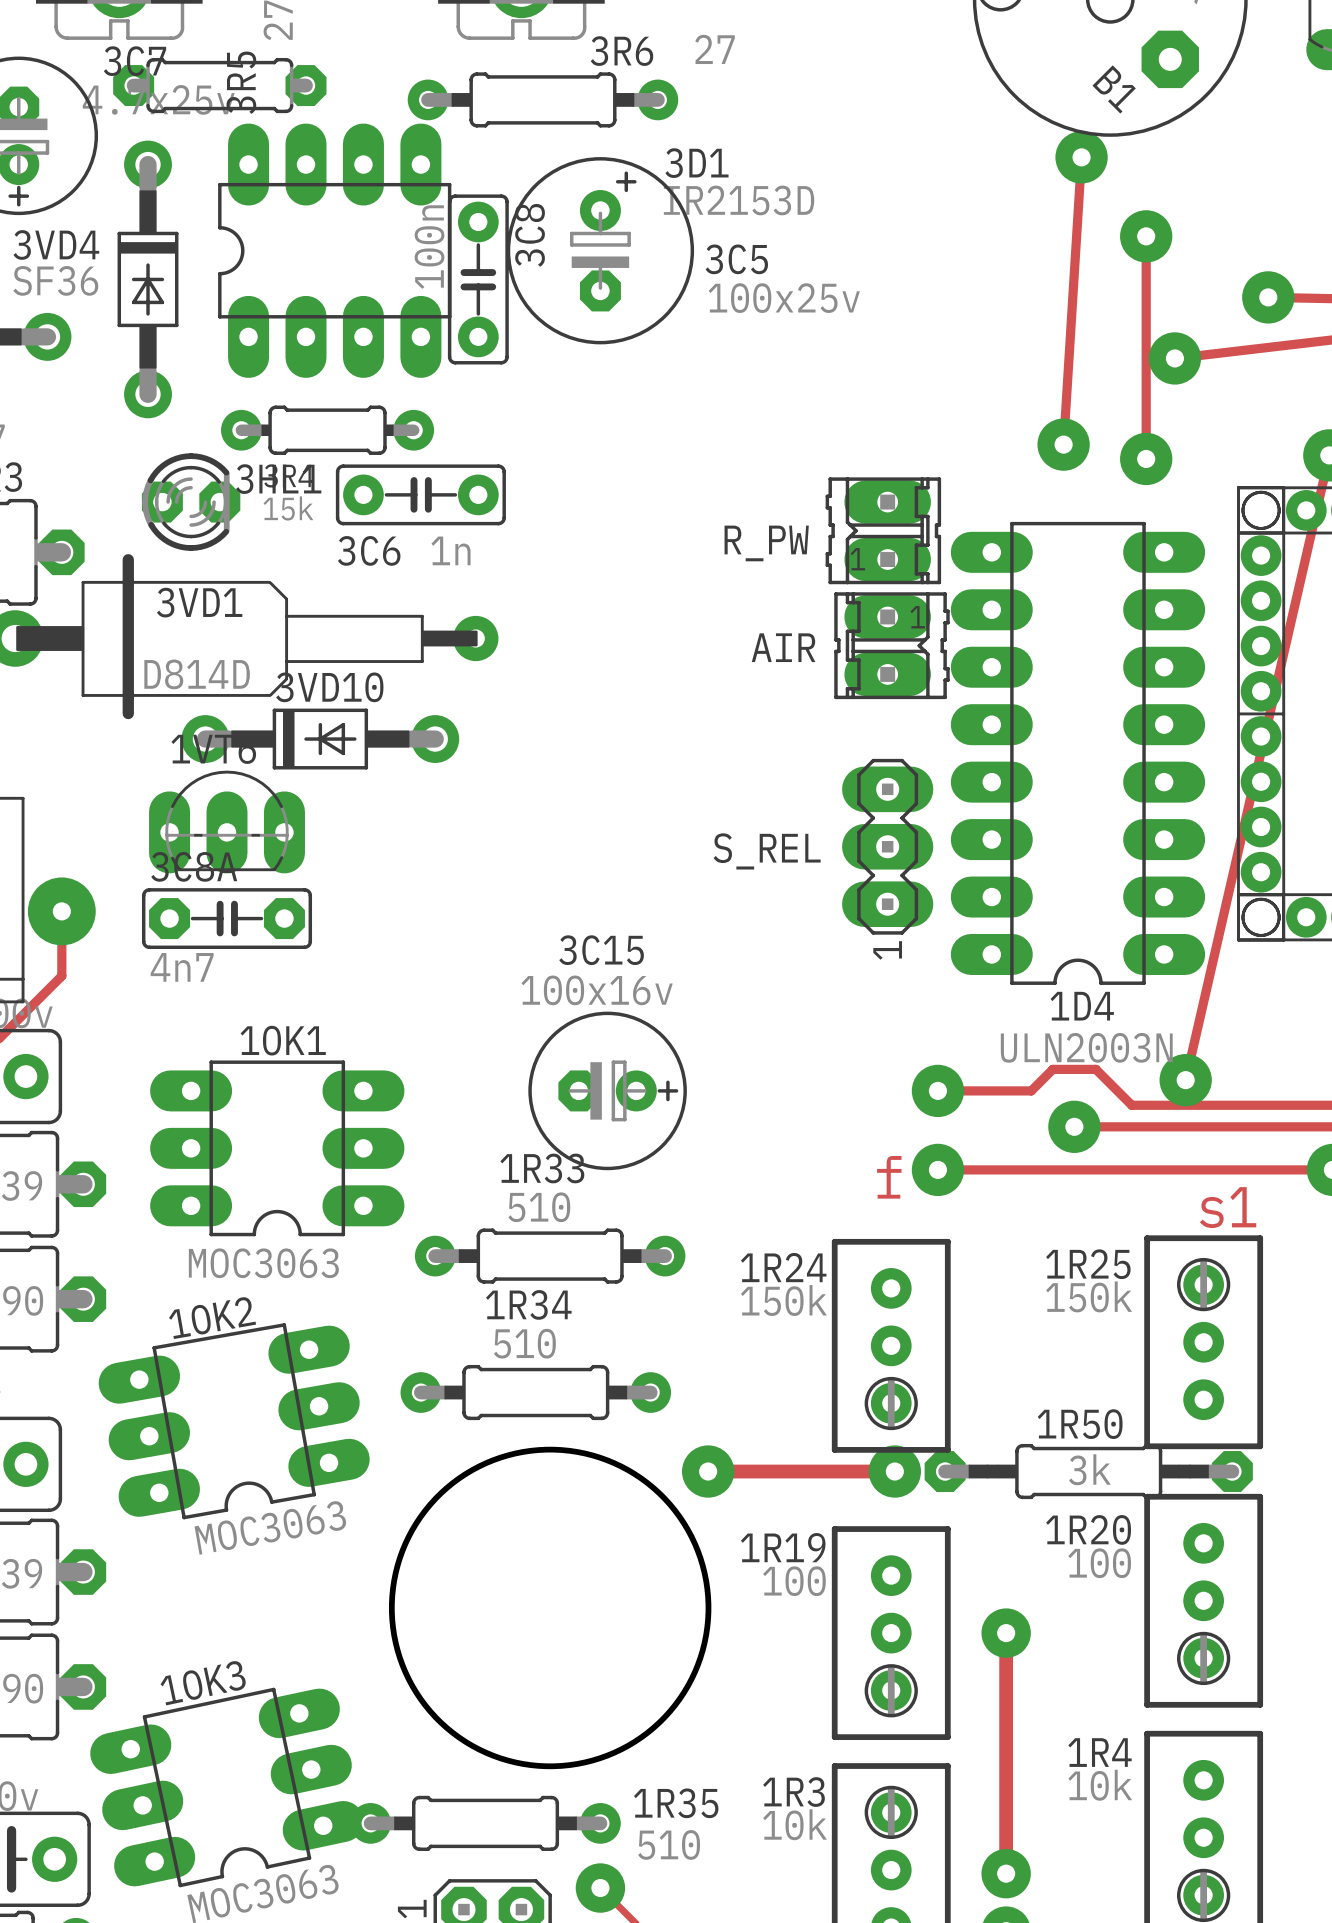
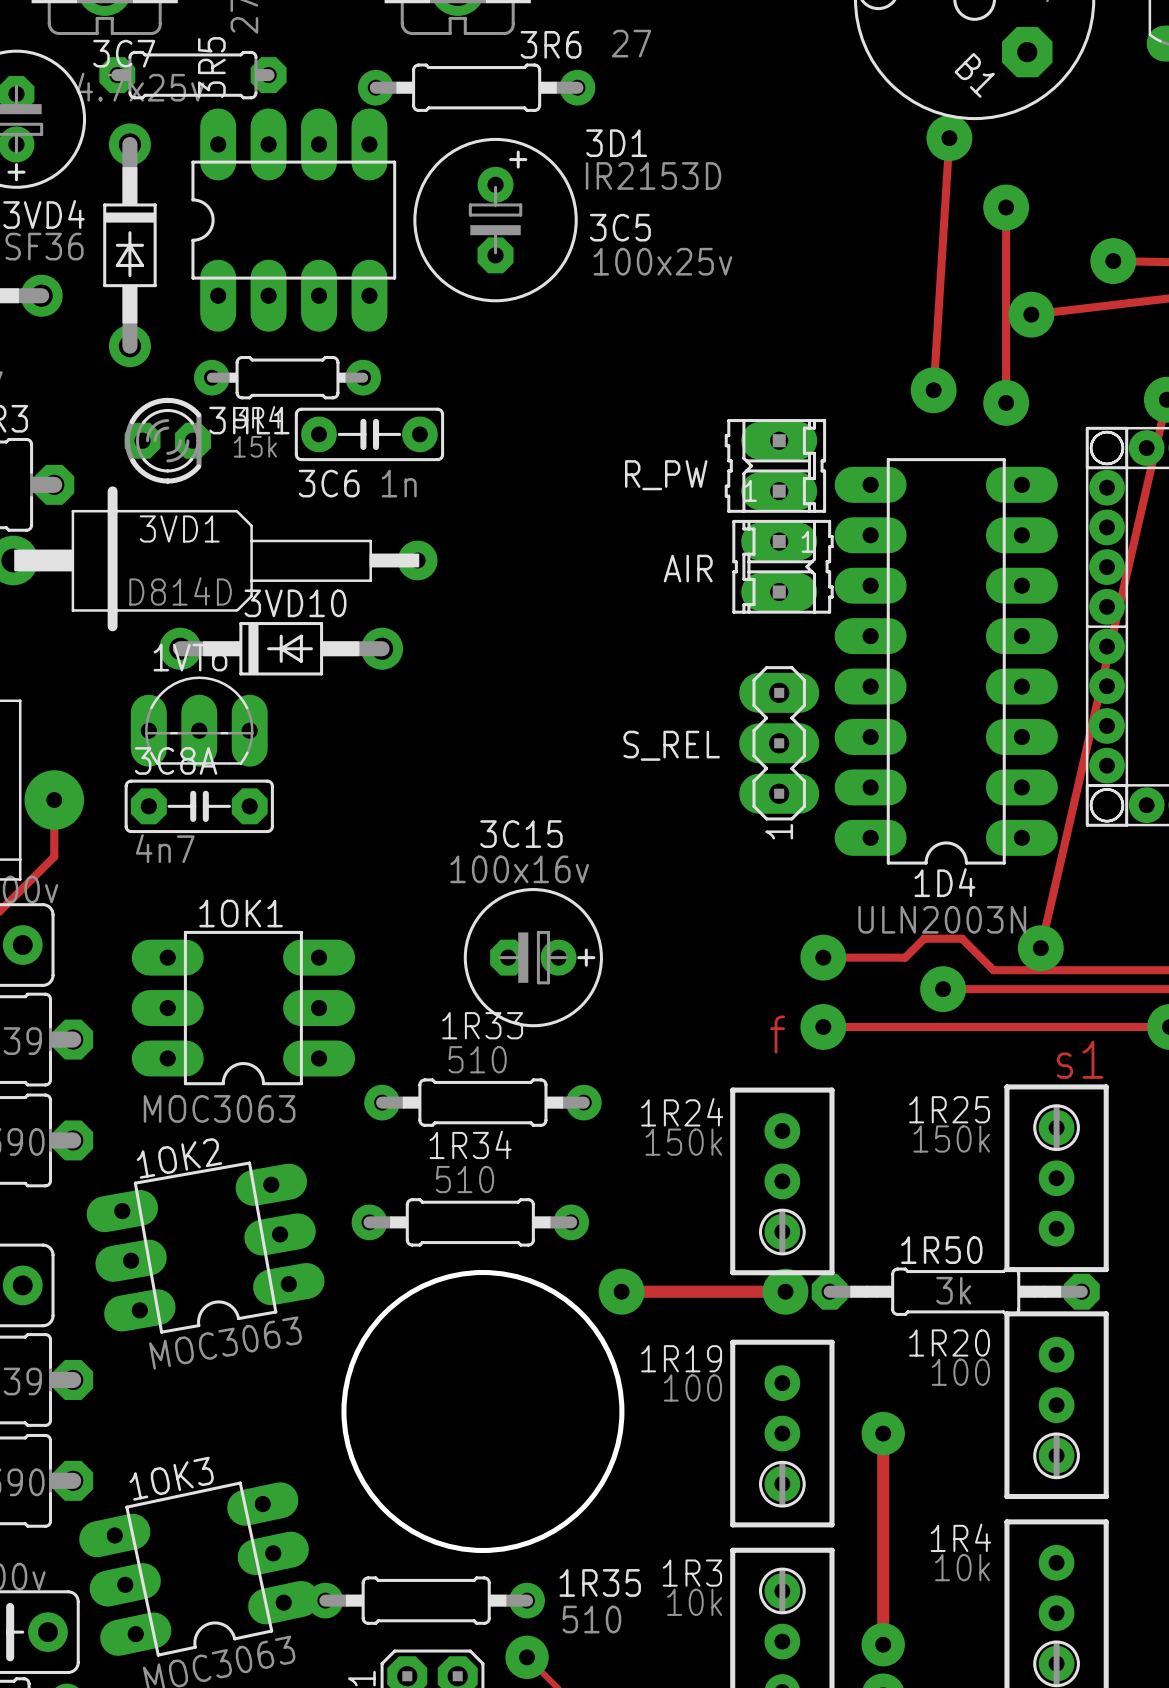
3C5 position: (600, 250) -> (495, 220)
3C8: 100n (478, 279) -> none

